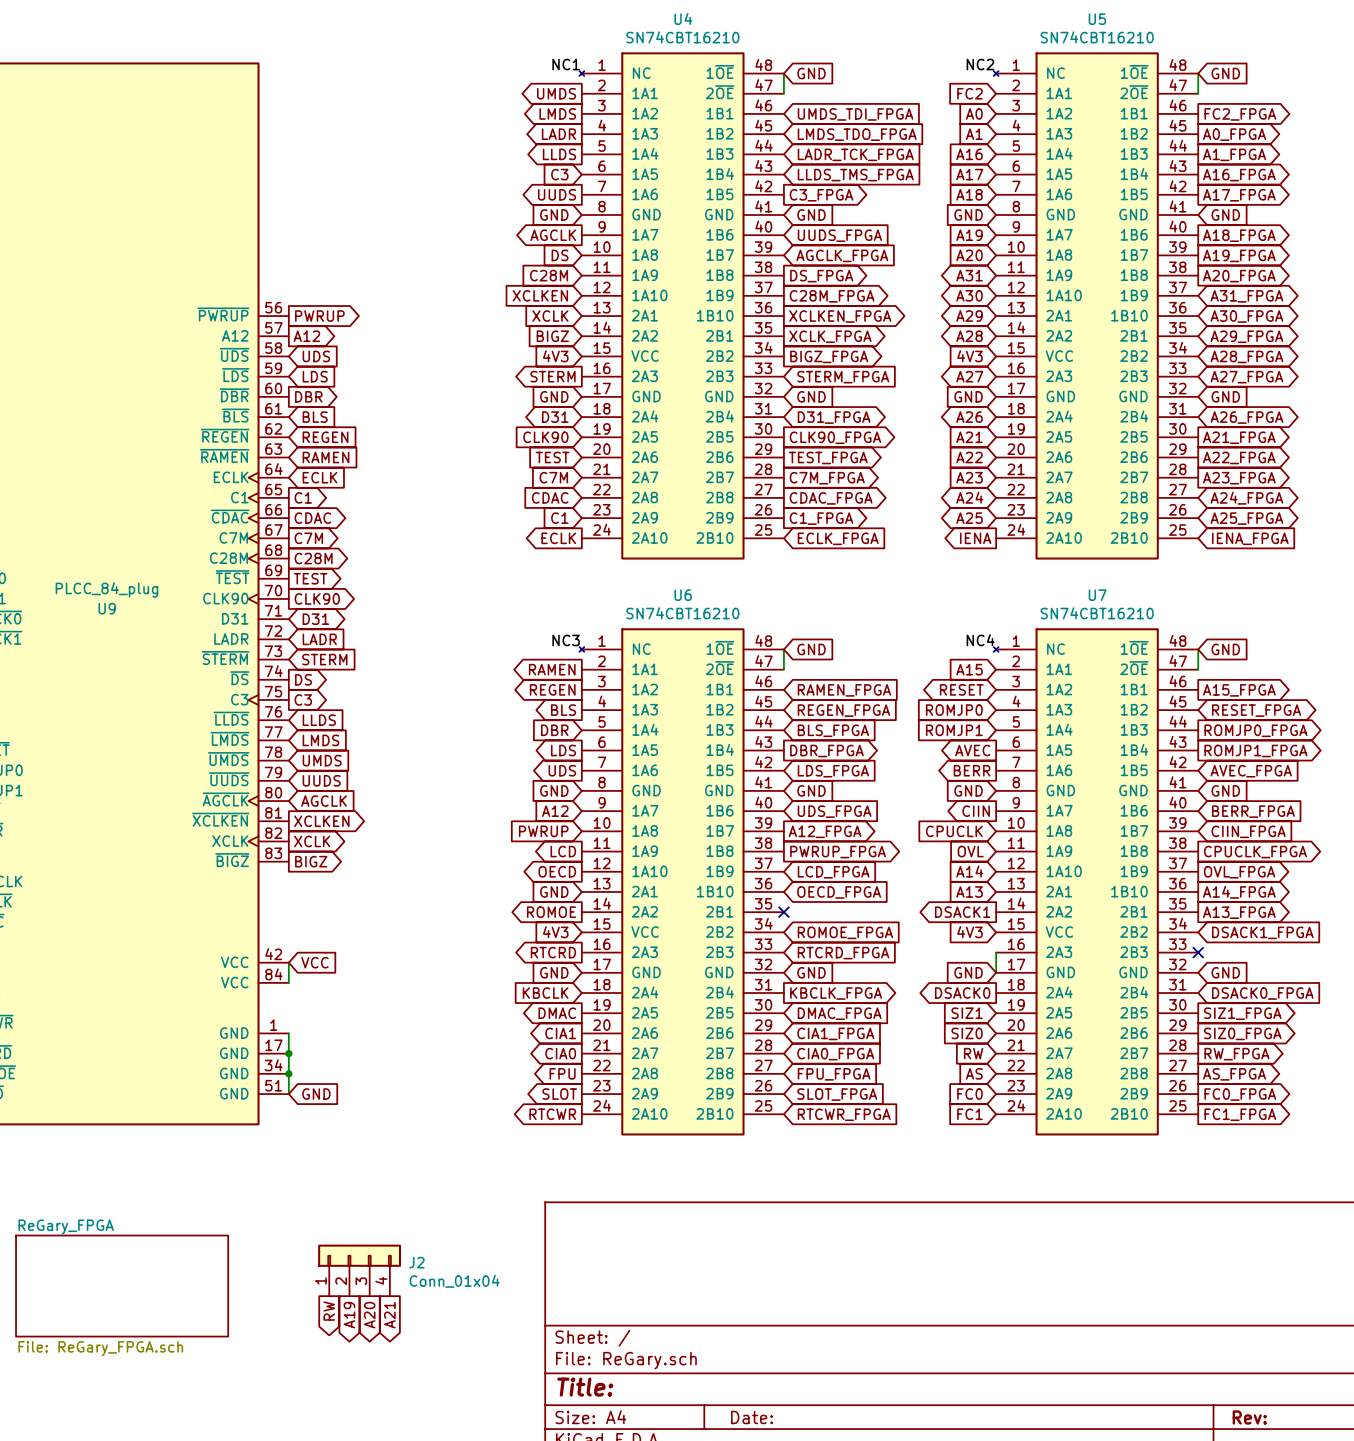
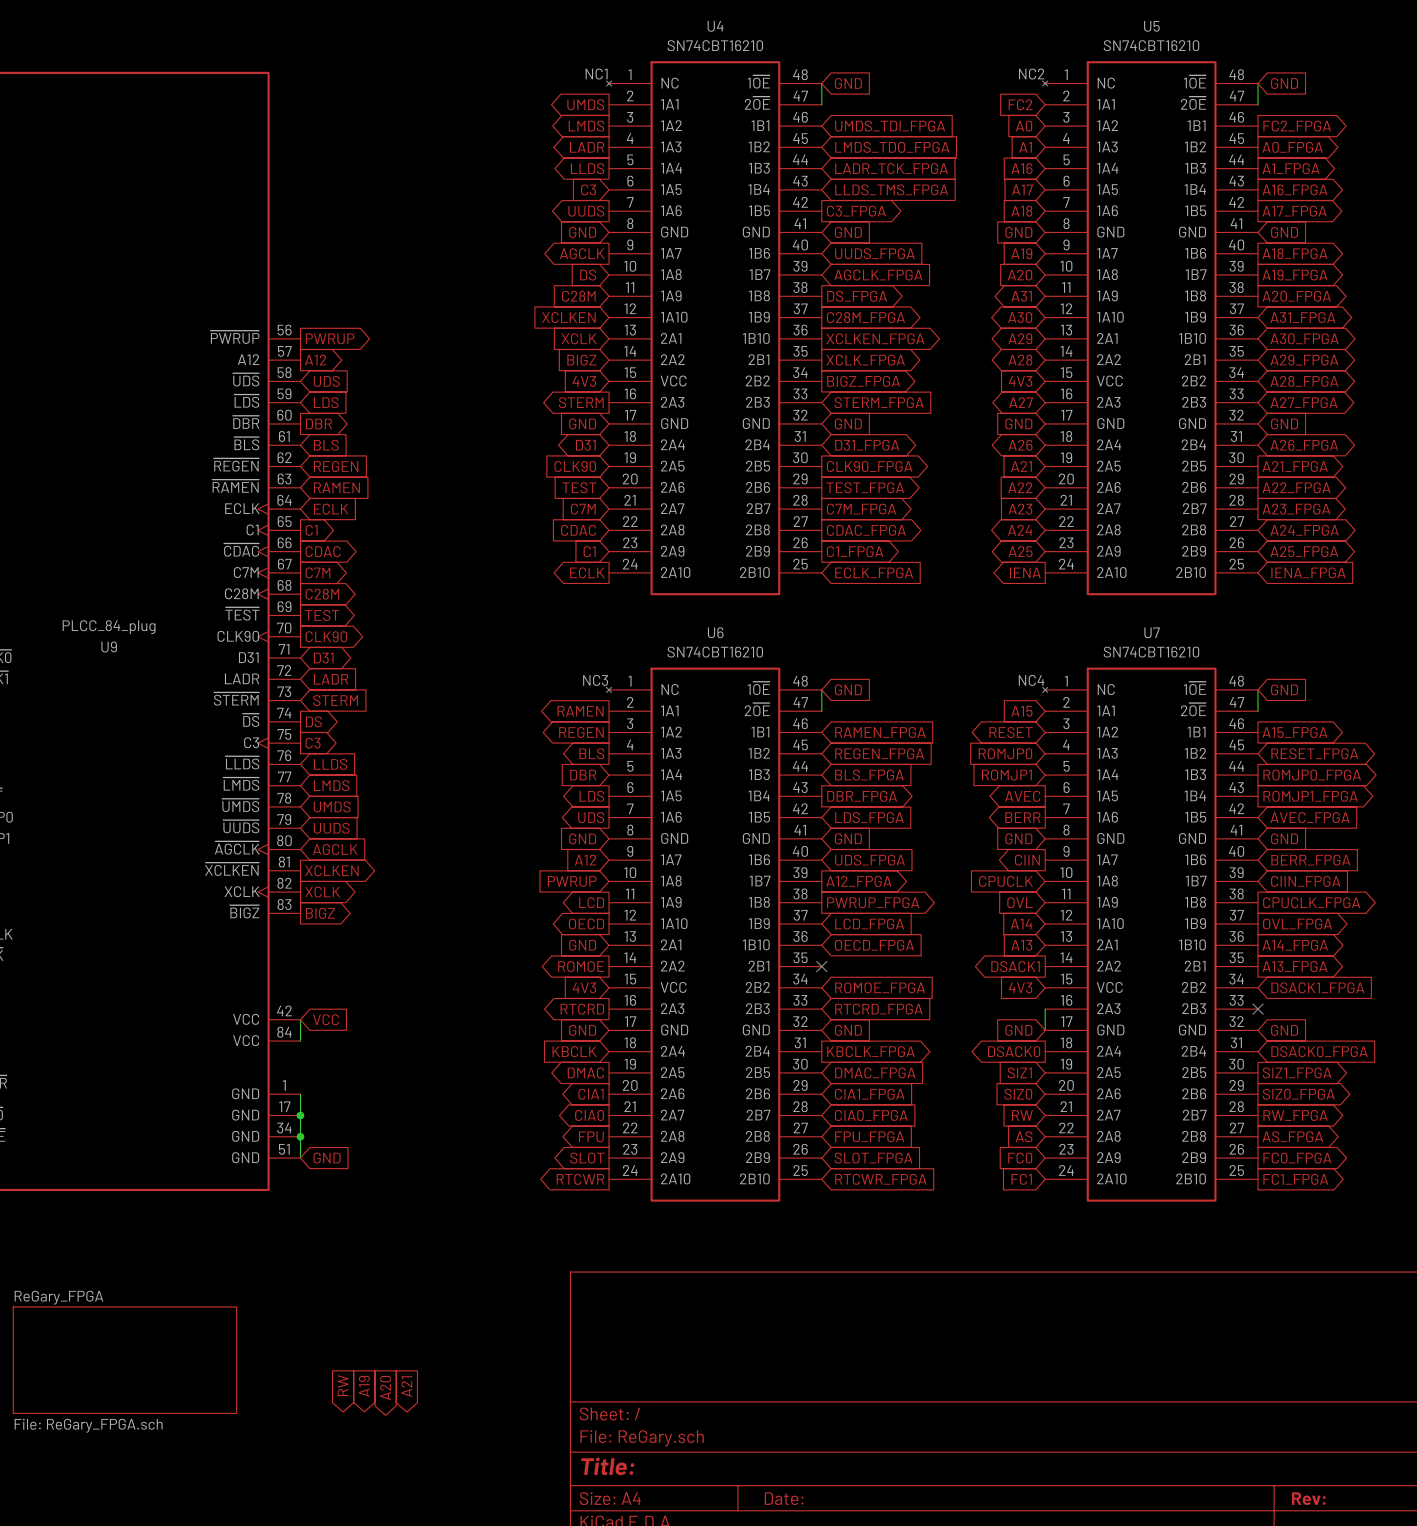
J2: Conn_01x04 (359, 1270) -> none

